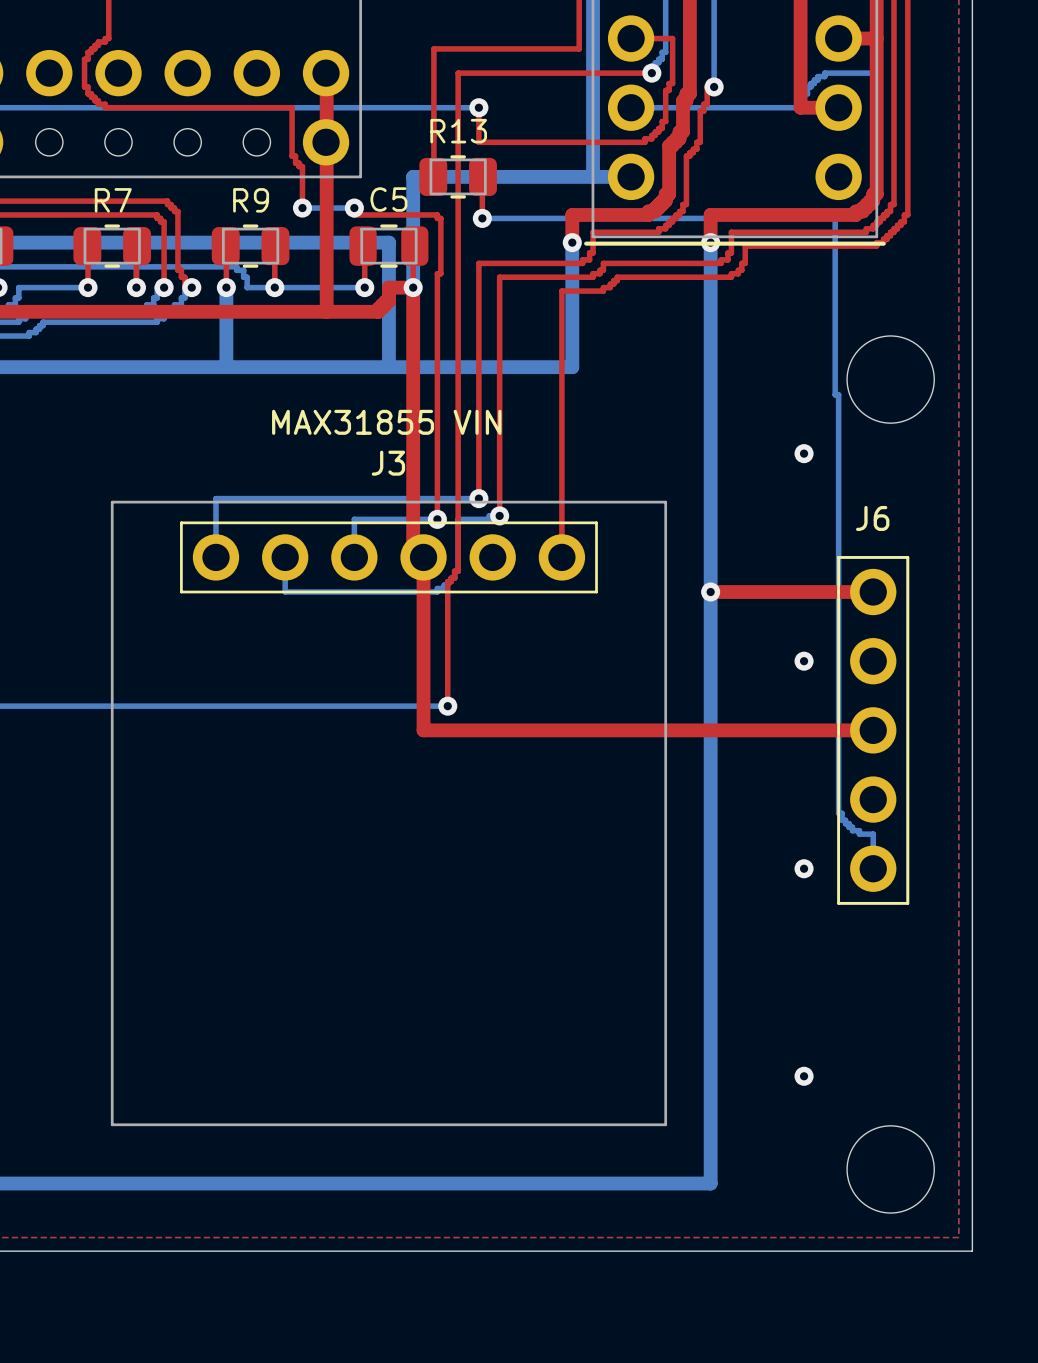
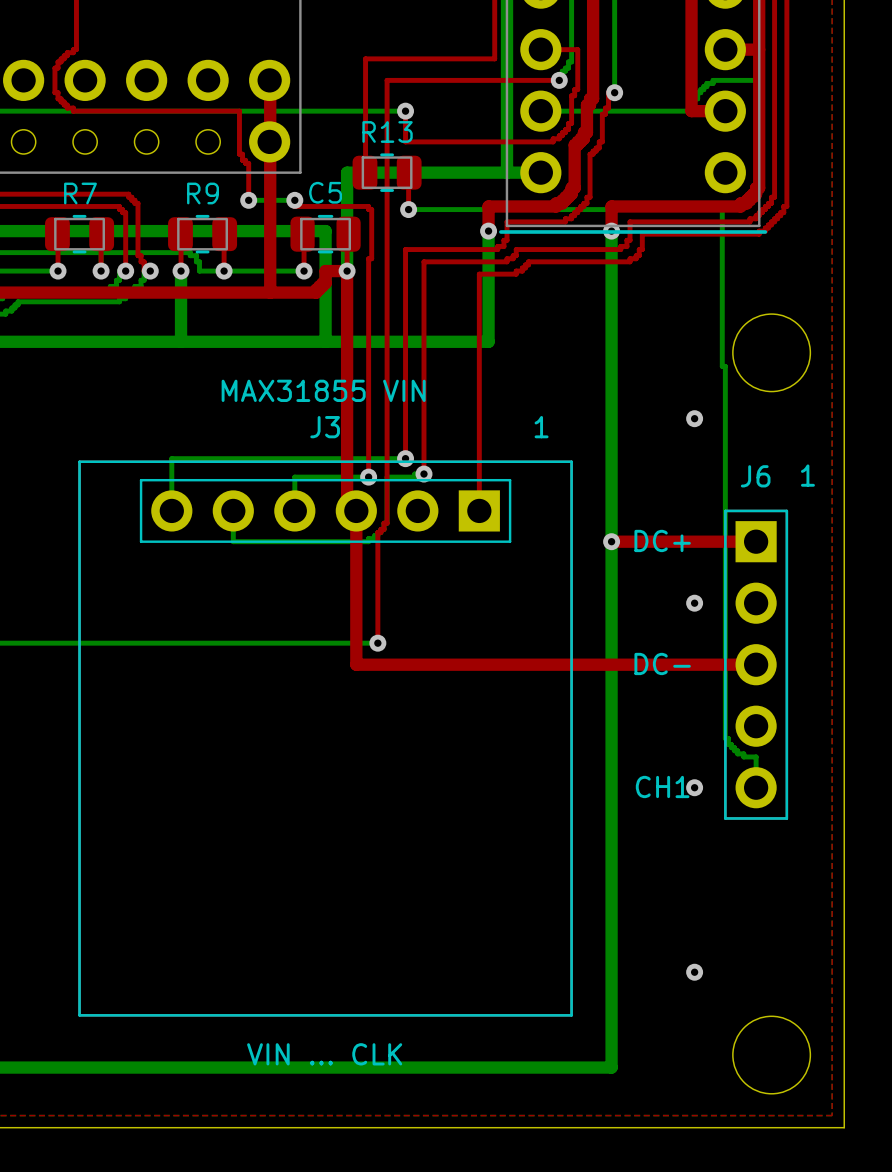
J3 footprint: [110, 500, 668, 1127] -> [78, 460, 573, 1017]
J6 footprint: [837, 556, 910, 905] -> [724, 509, 789, 820]

